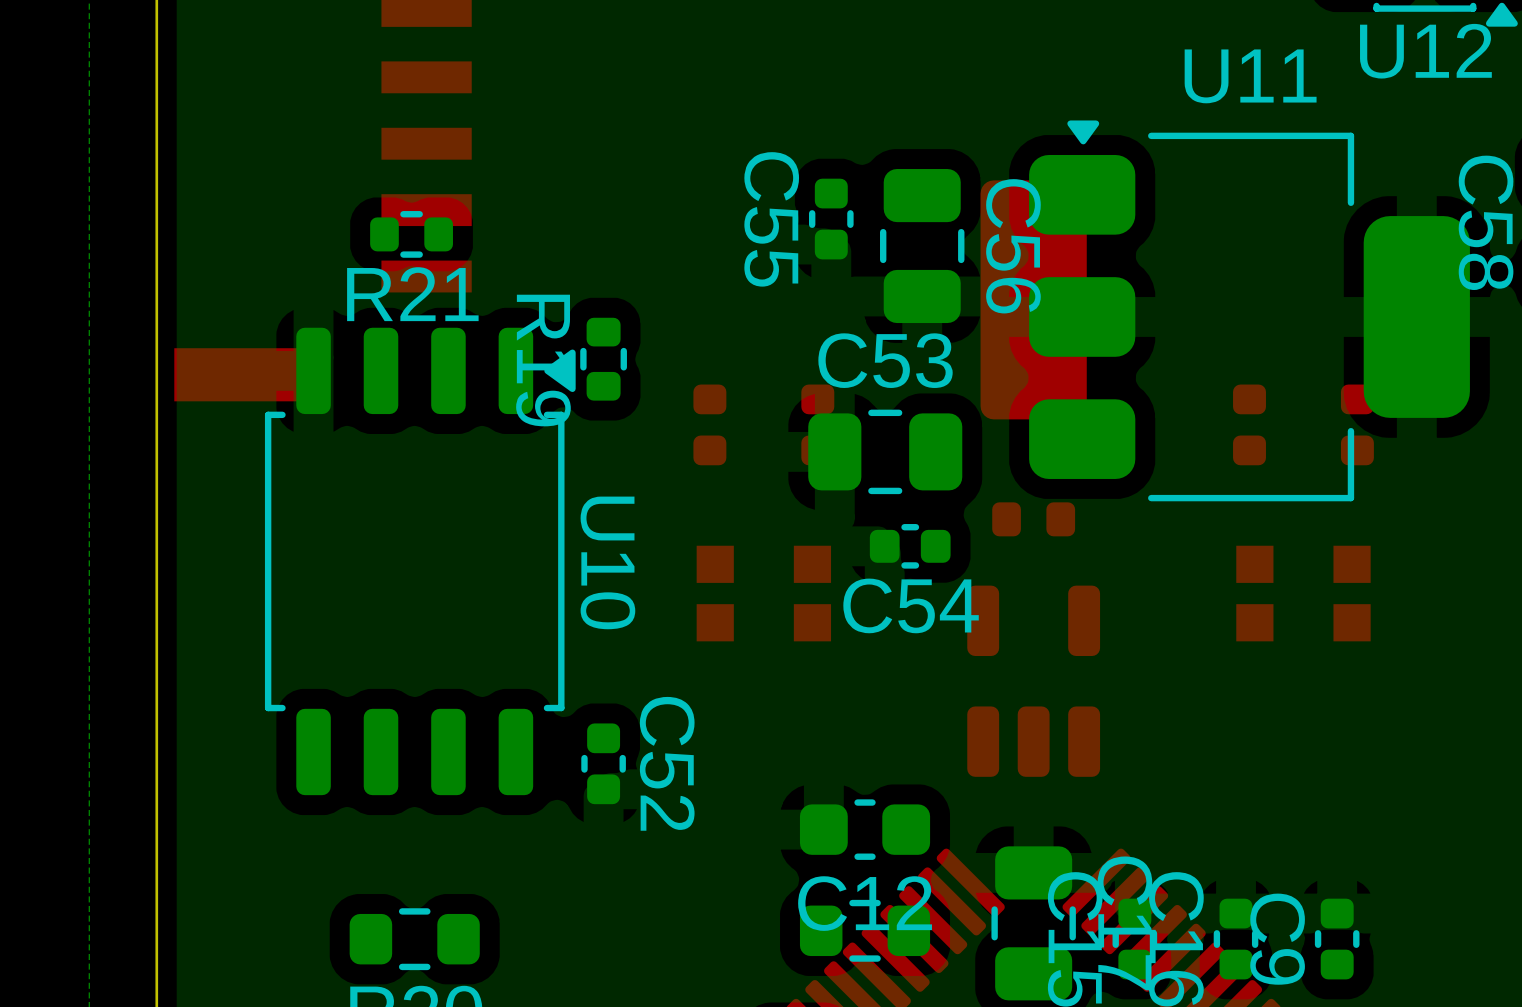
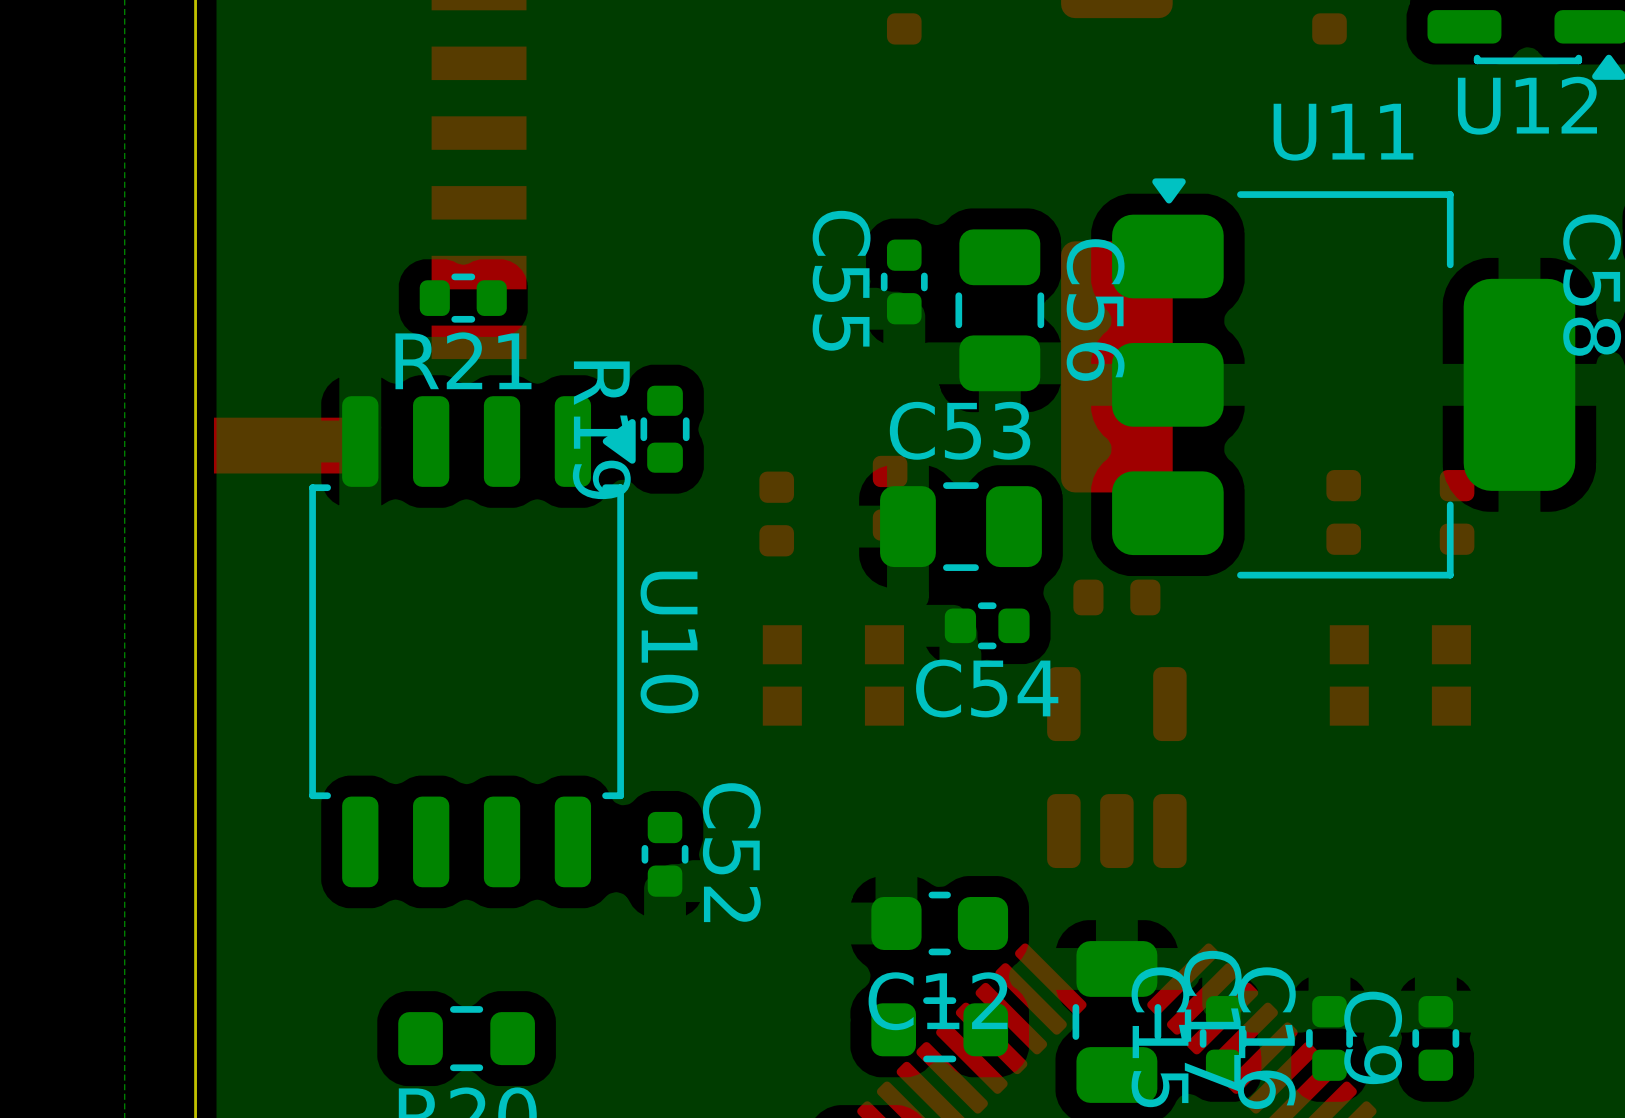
part position: (709, 424) -> (776, 513)
part position: (1249, 424) -> (1343, 512)
part position: (1357, 424) -> (1457, 512)

